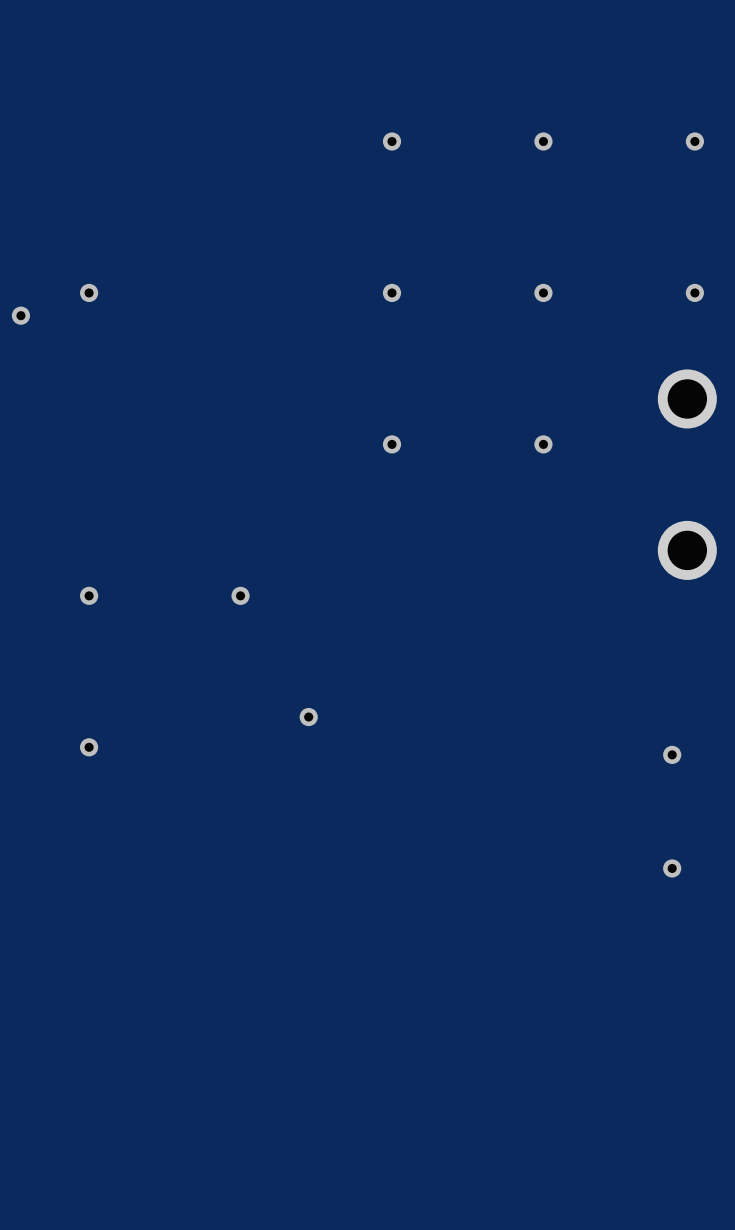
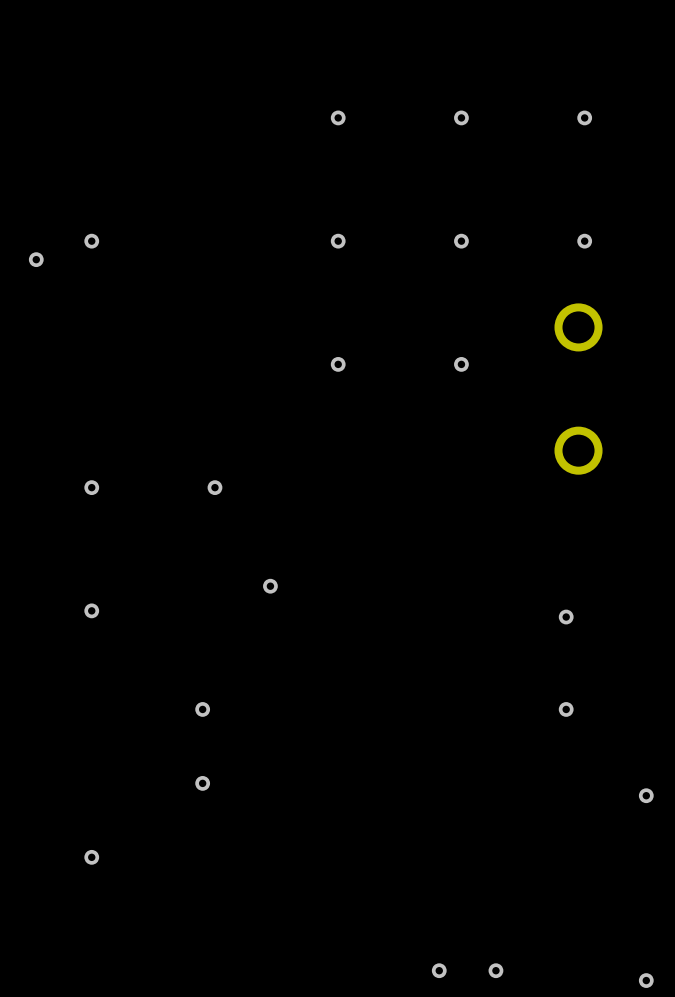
via: none -> (202, 709)
via: none -> (202, 783)
via: none -> (91, 857)
via: none -> (439, 970)
via: none -> (495, 970)

